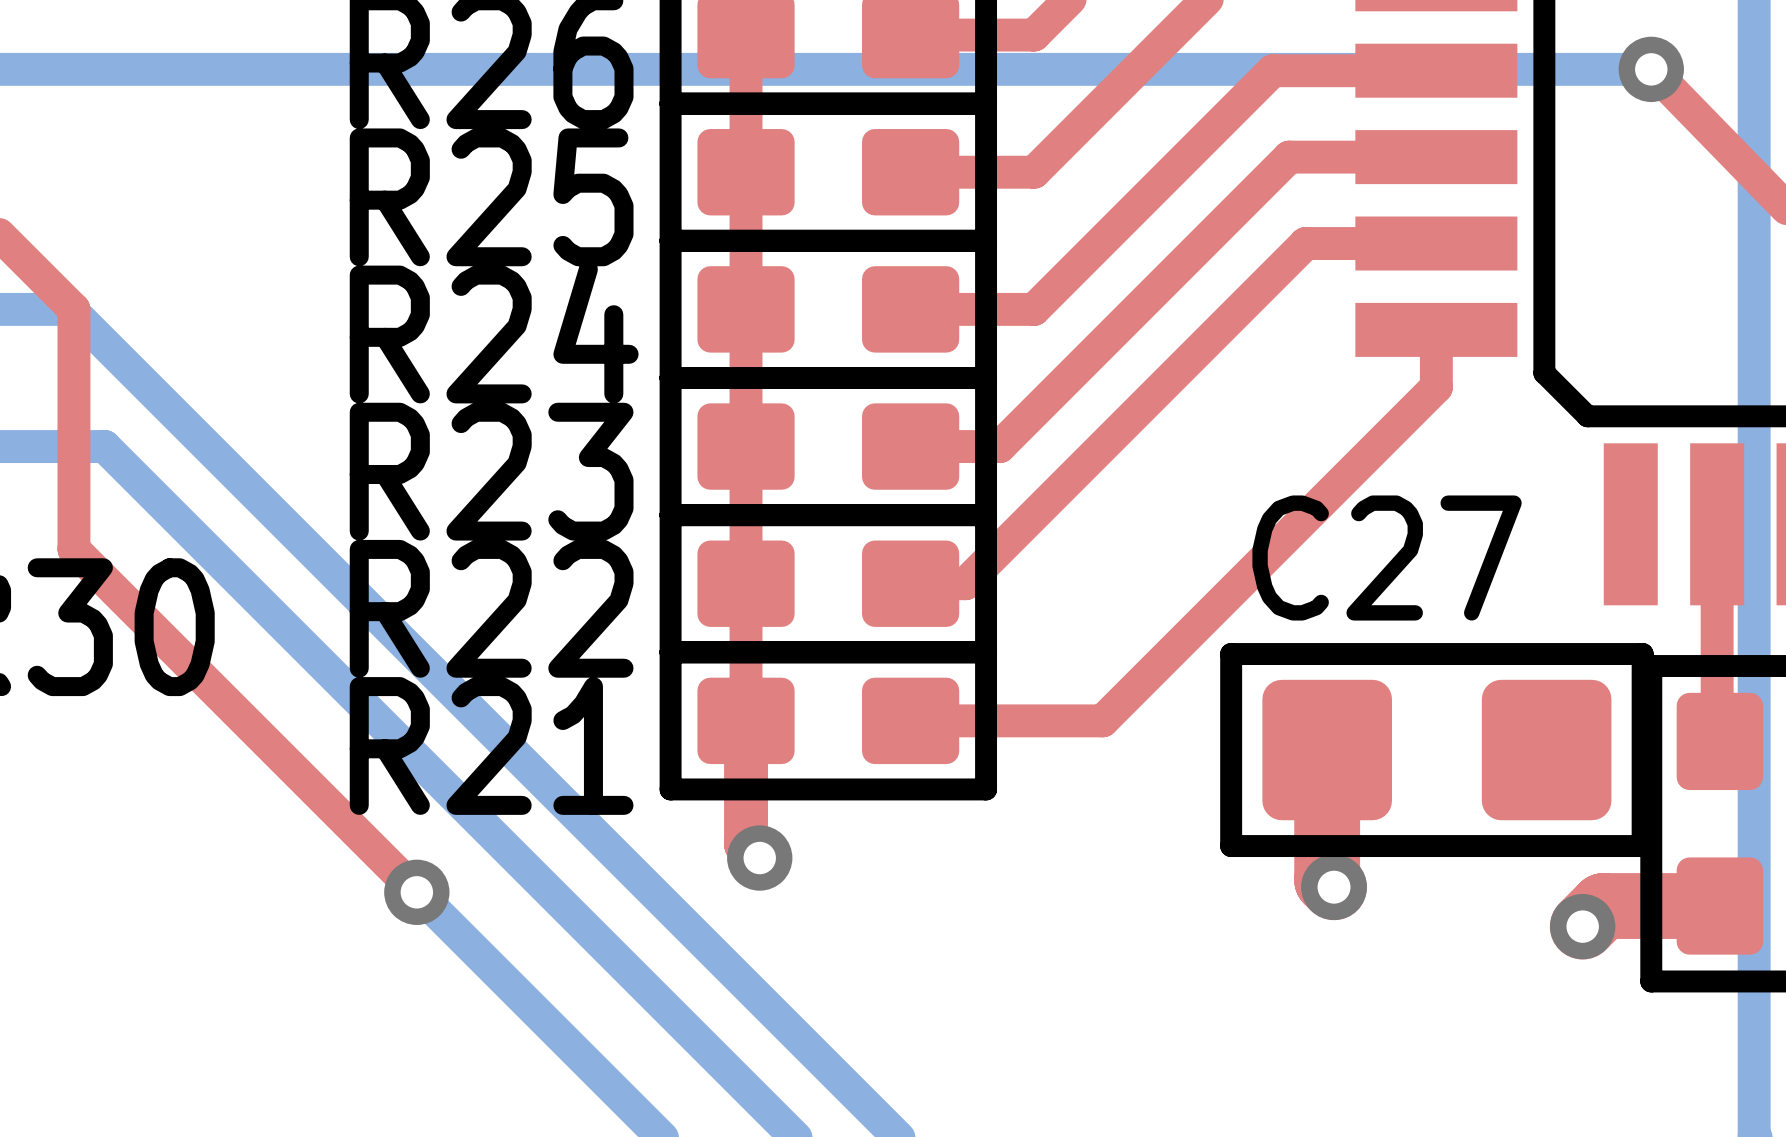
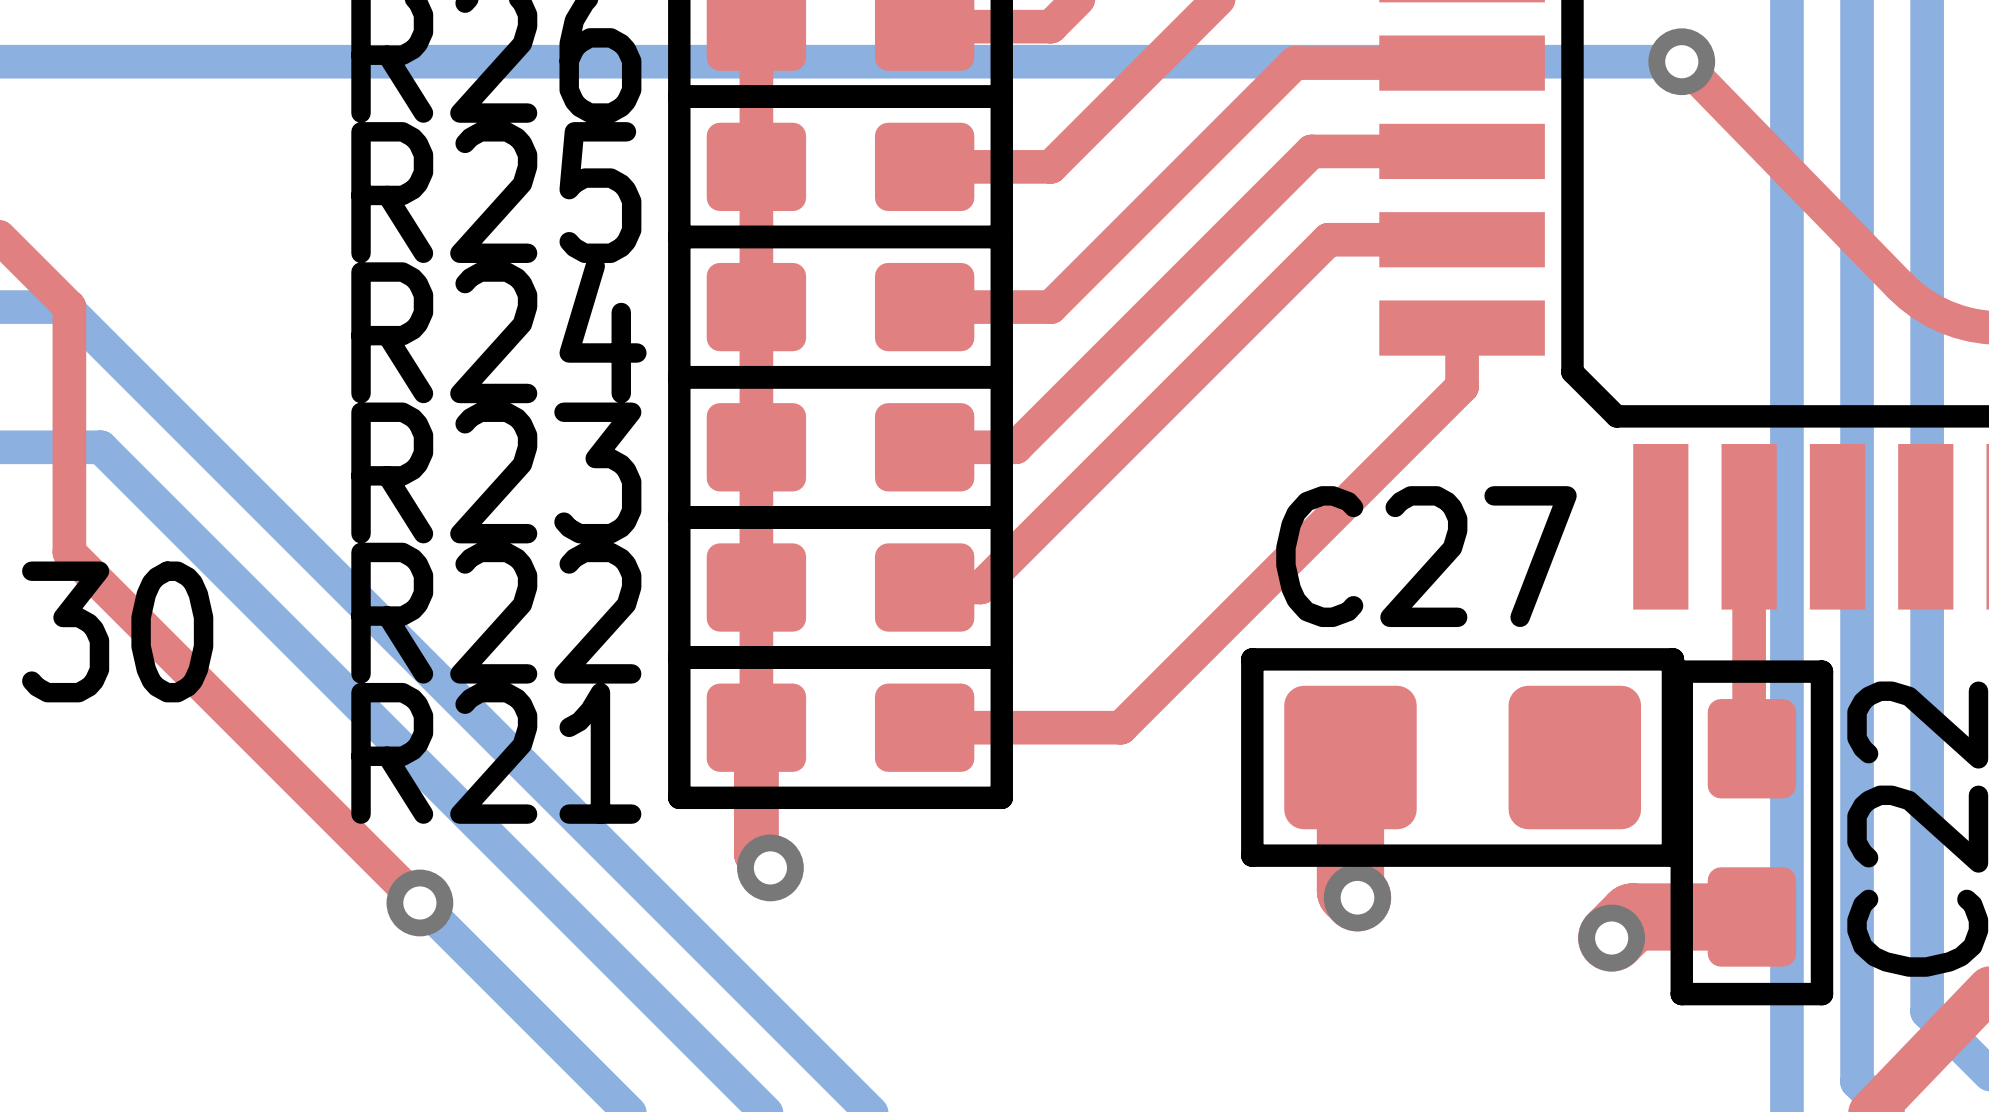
C27 name position: C27 (1387, 558) -> C27 (1426, 556)

